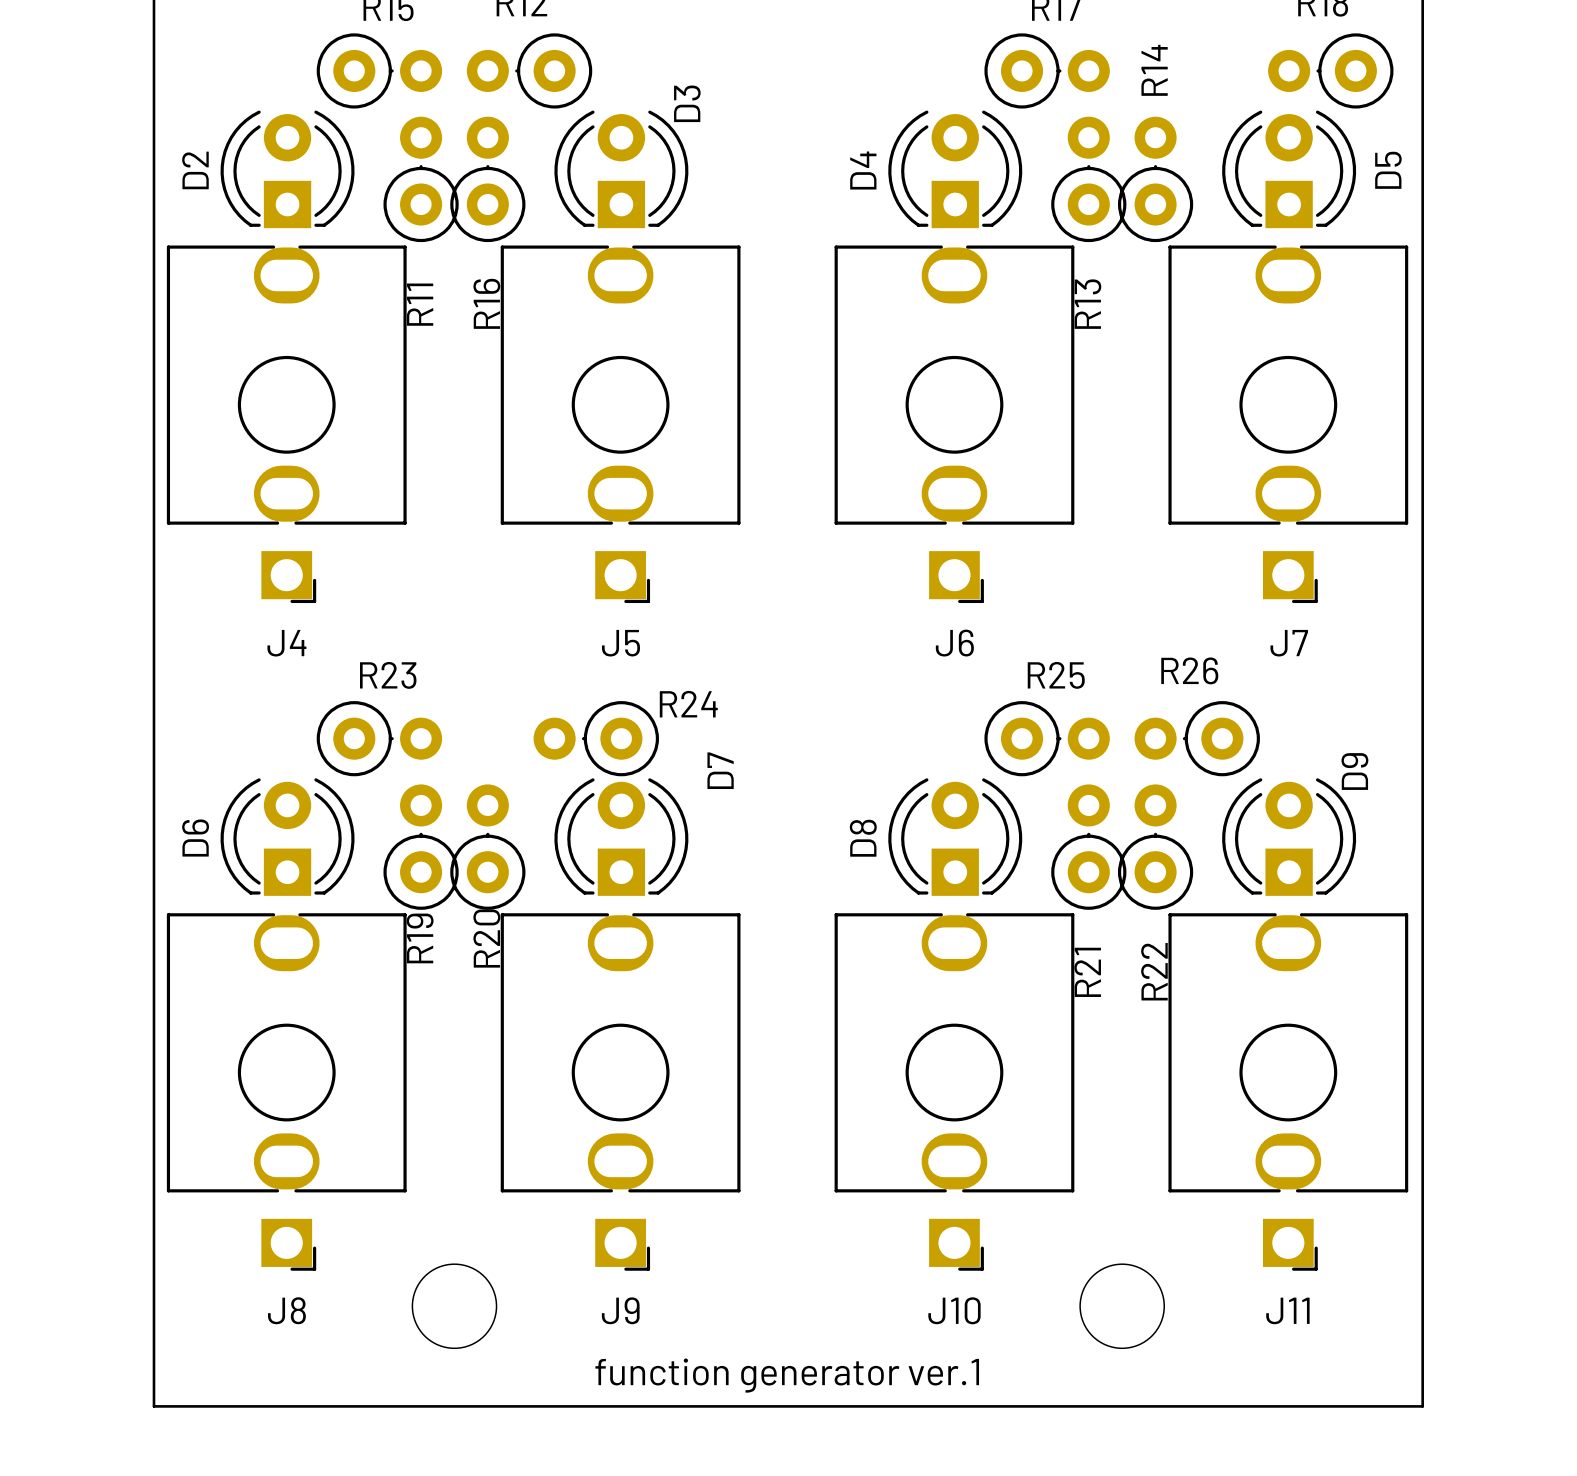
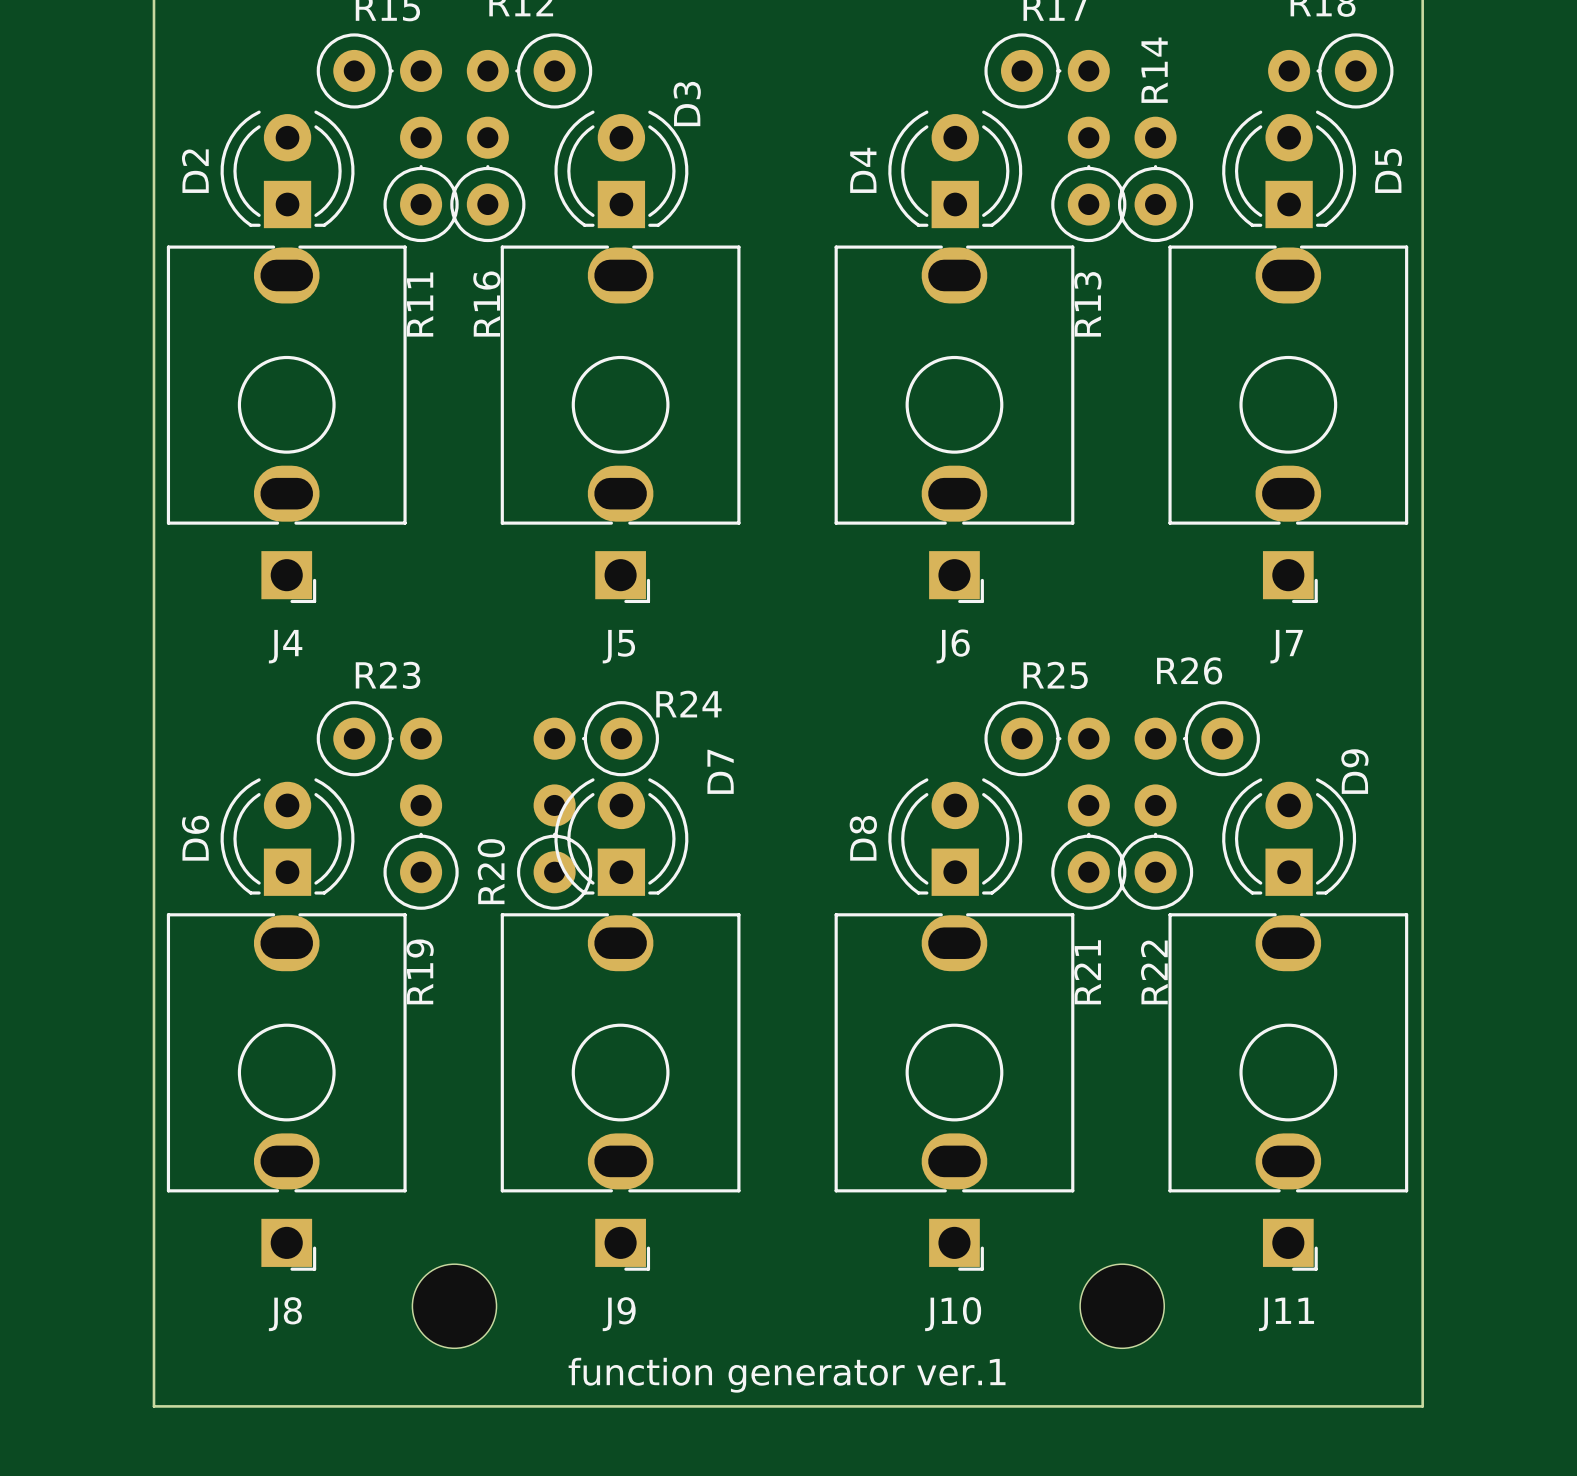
R20 position: (487, 847) -> (554, 847)
R19 name position: R19 (420, 938) -> R19 (420, 971)
R20 name position: R20 (486, 938) -> R20 (491, 871)

